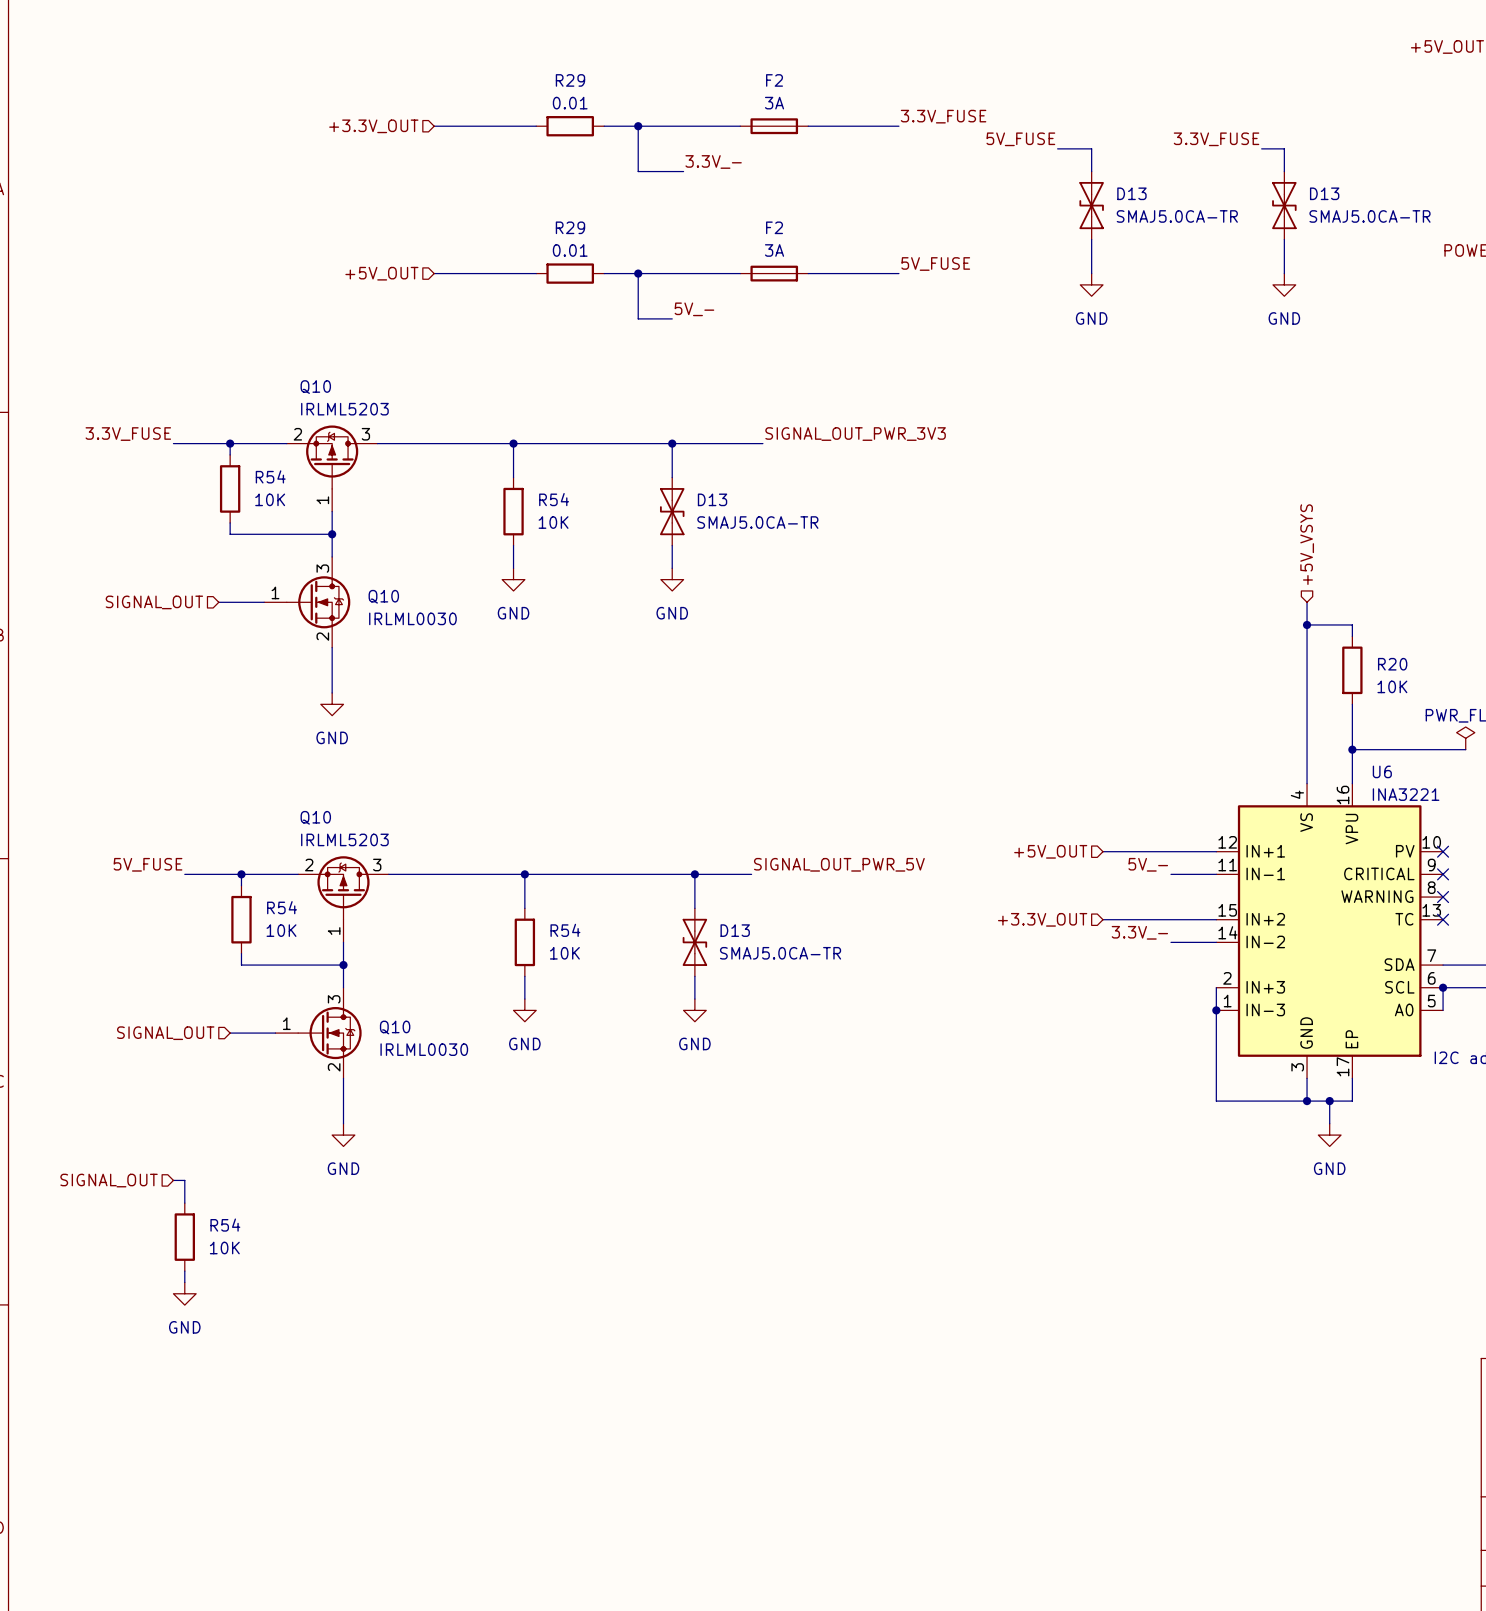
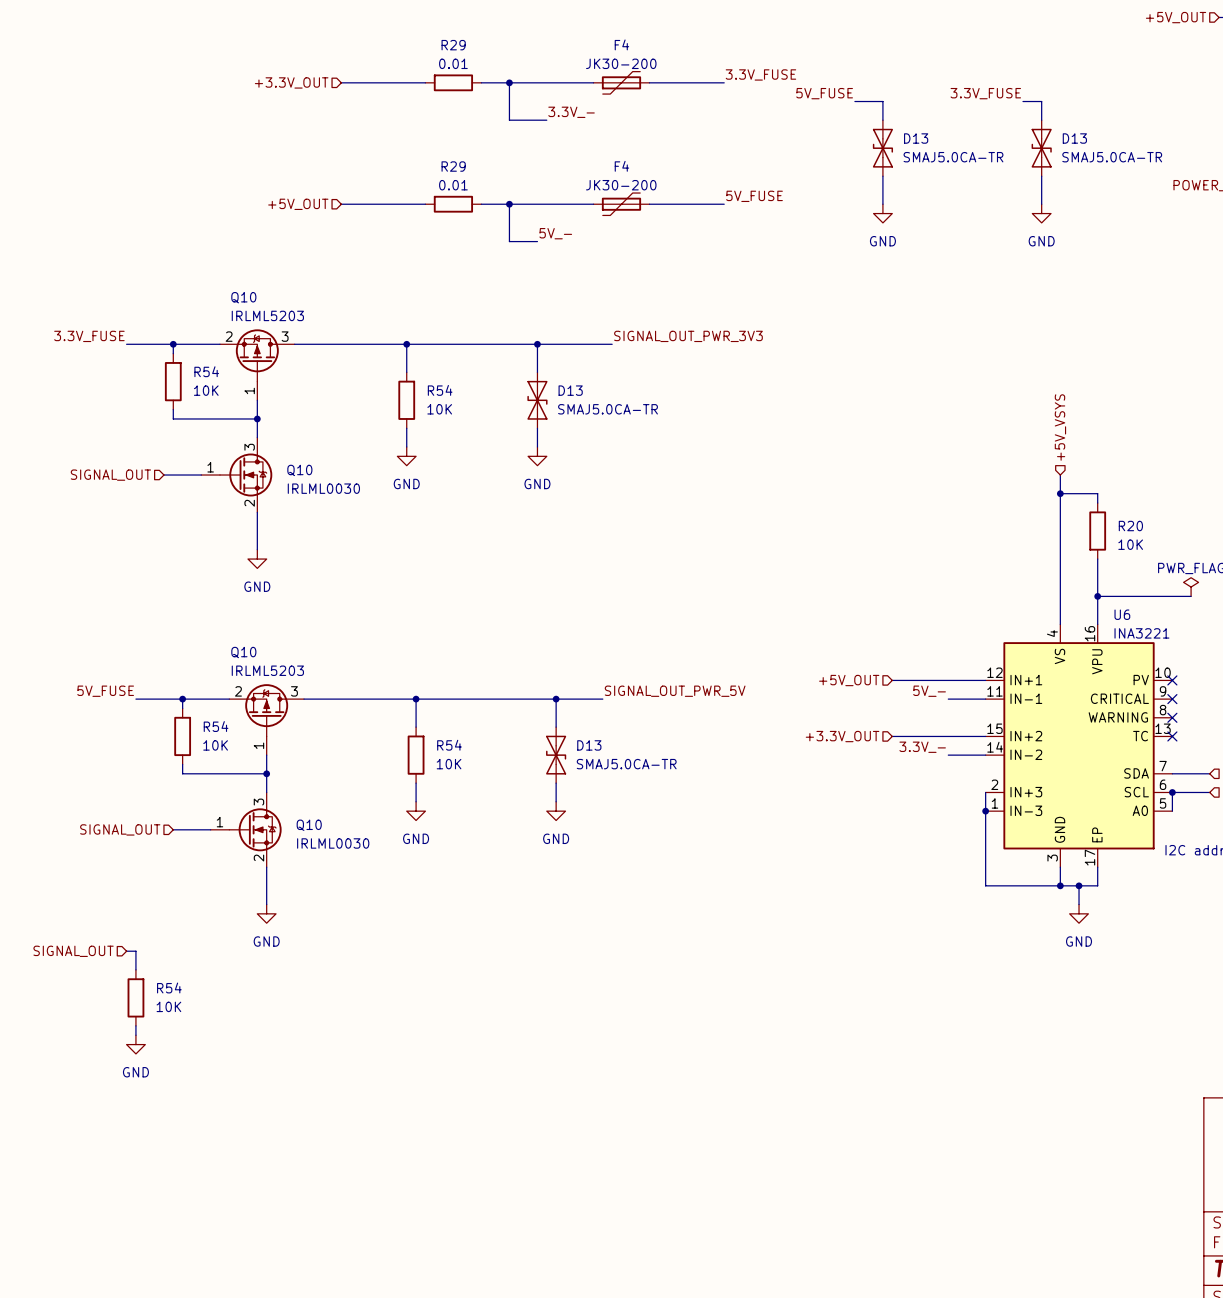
F2: 3A (774, 126) -> none
F4: none -> JK30-200 (621, 82)
F2: 3A (774, 273) -> none
F4: none -> JK30-200 (621, 204)

